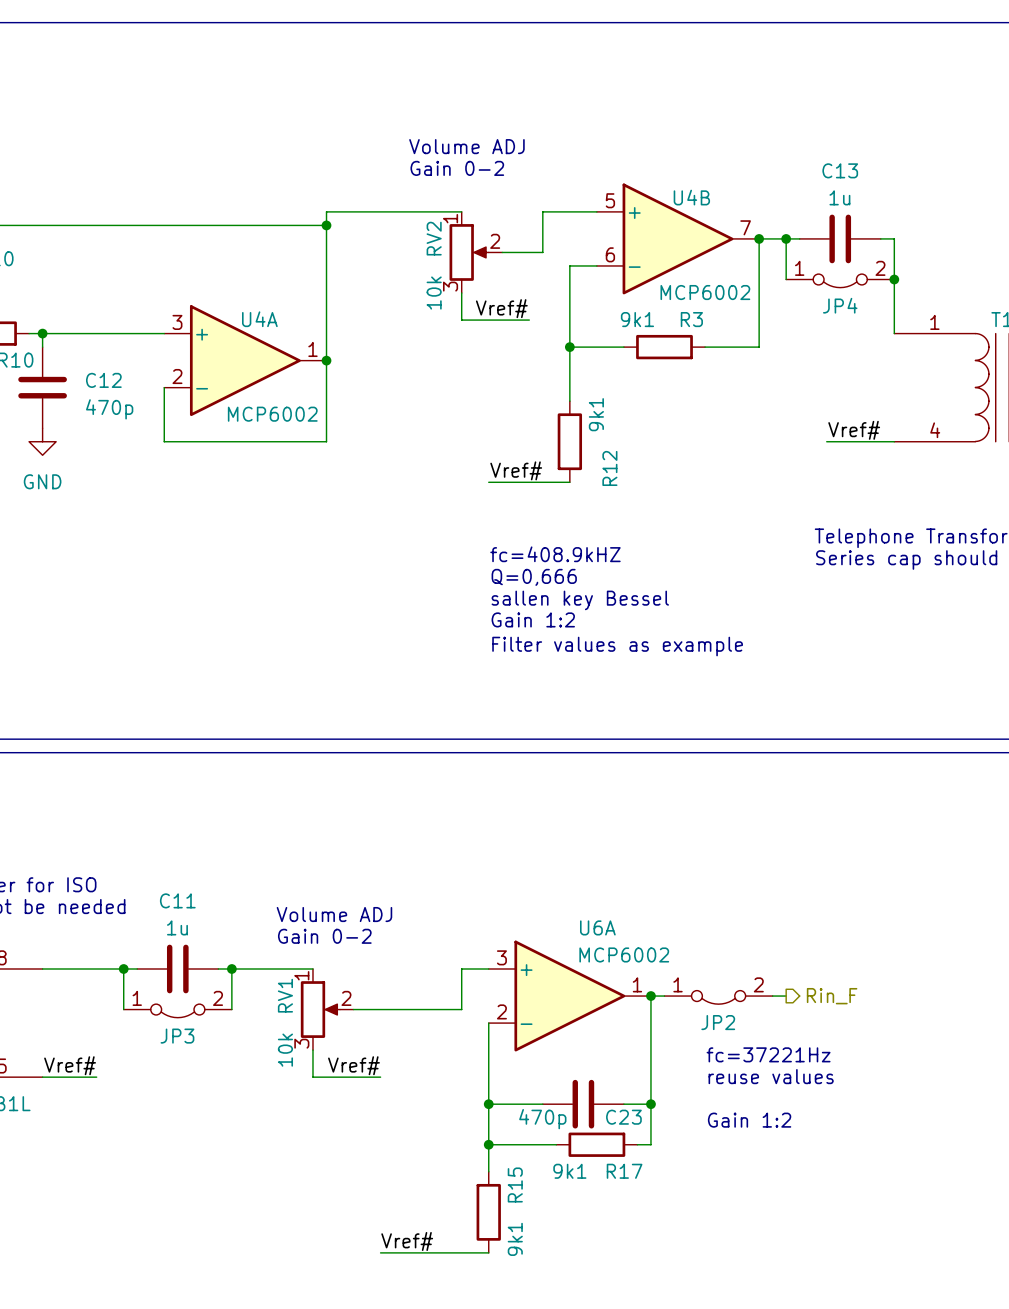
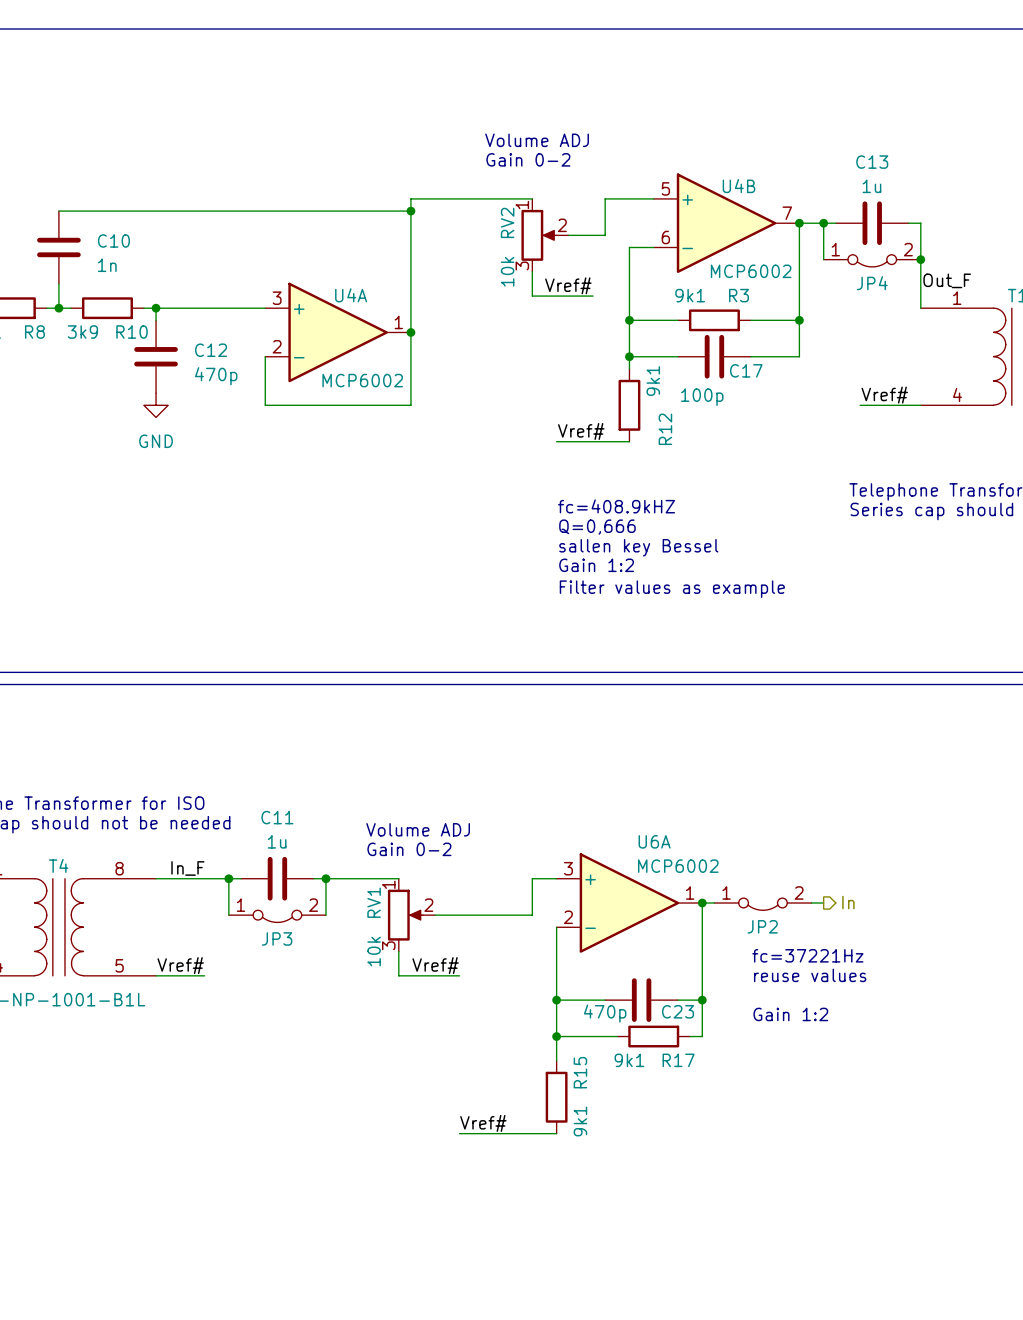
label: none -> Out_F (947, 280)
wire: none -> (799, 320) (799, 356) (750, 356)
junction: none -> (799, 320)
wire: none -> (629, 356) (678, 356)
junction: none -> (629, 356)
C17: none -> 100p (714, 356)
label: none -> In_F (187, 868)
hierarchical label: Rin_F (832, 996) -> In (848, 902)

